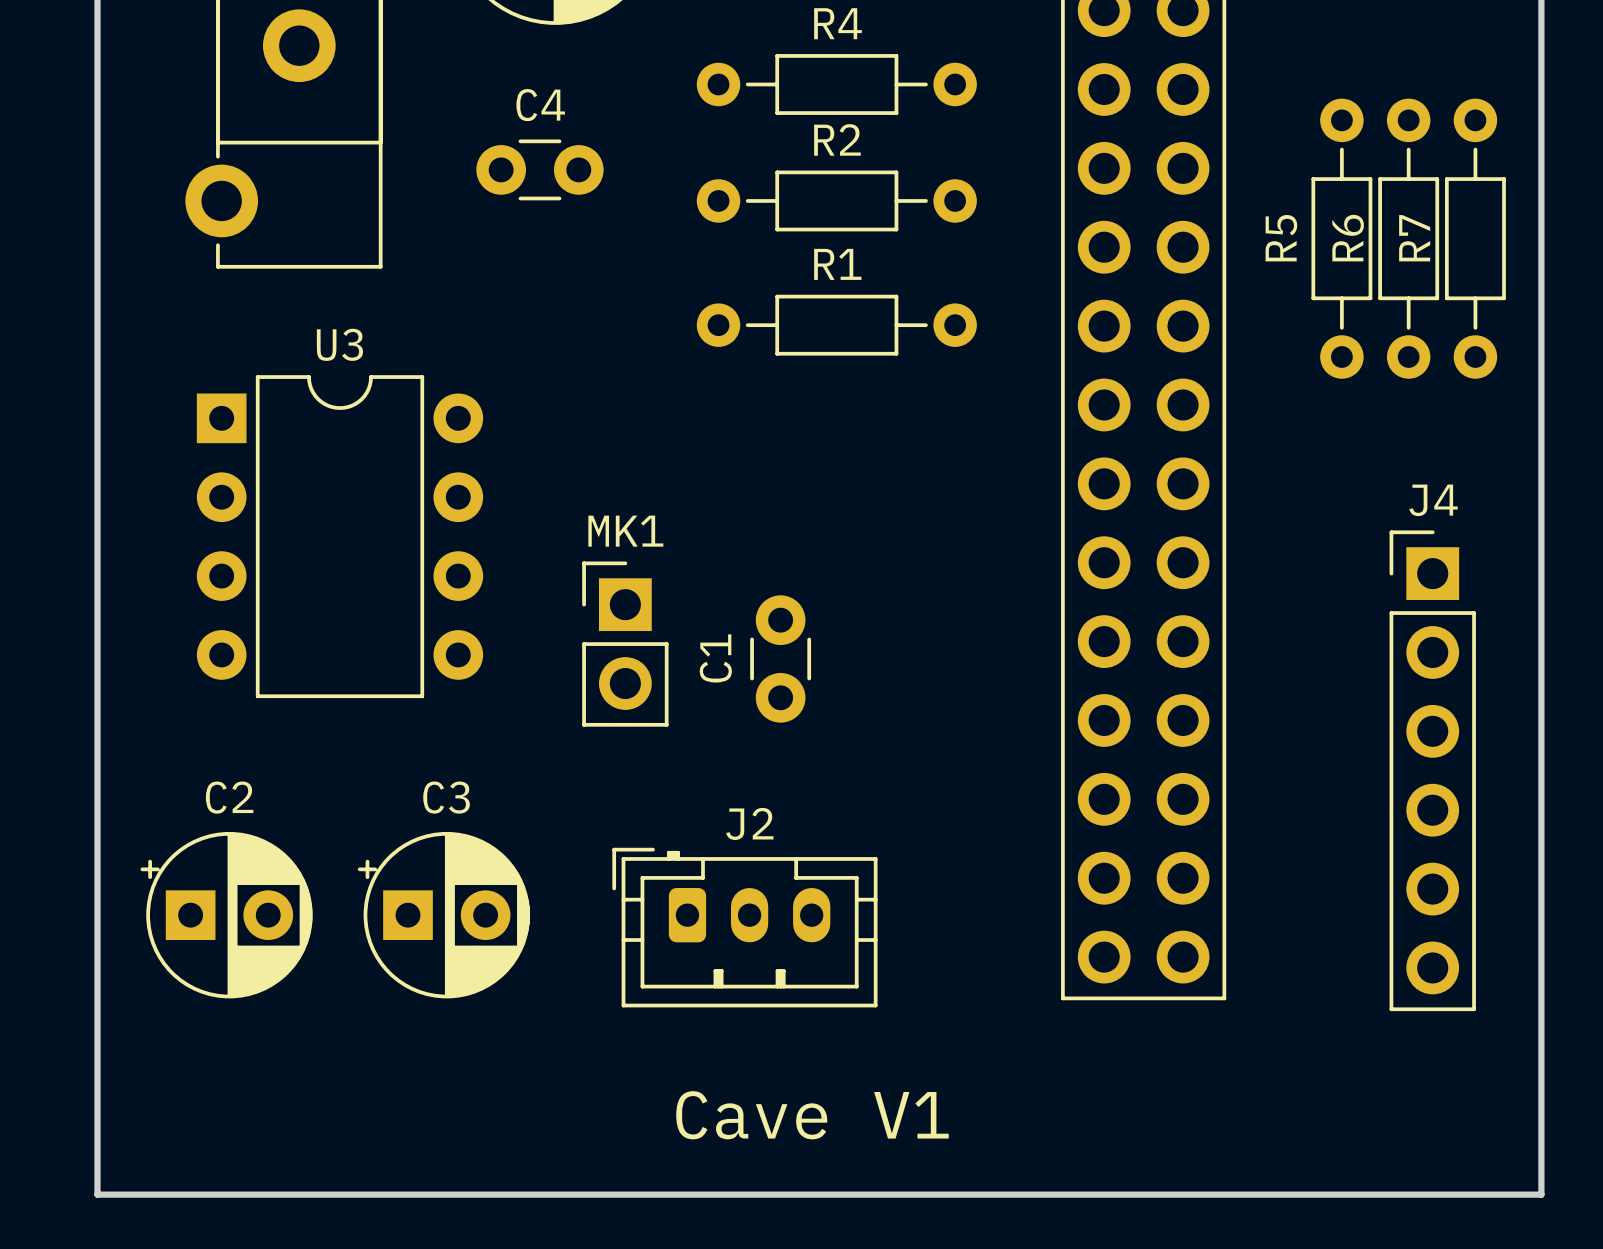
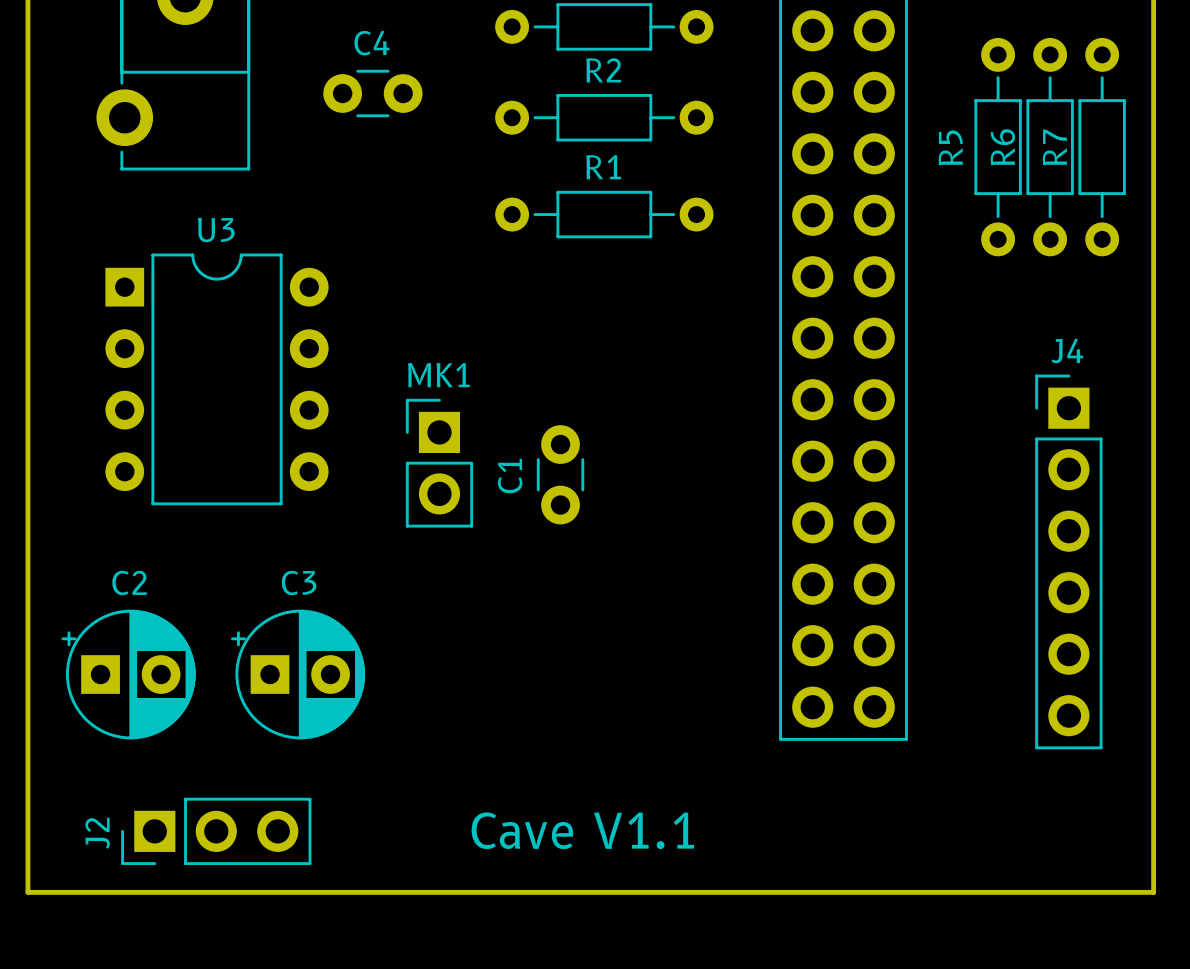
J2 name position: J2 (749, 823) -> J2 (97, 833)
J2 footprint: [612, 847, 878, 1008] -> [121, 797, 312, 866]
text: Cave V1 (812, 1115) -> Cave V1.1 (582, 830)

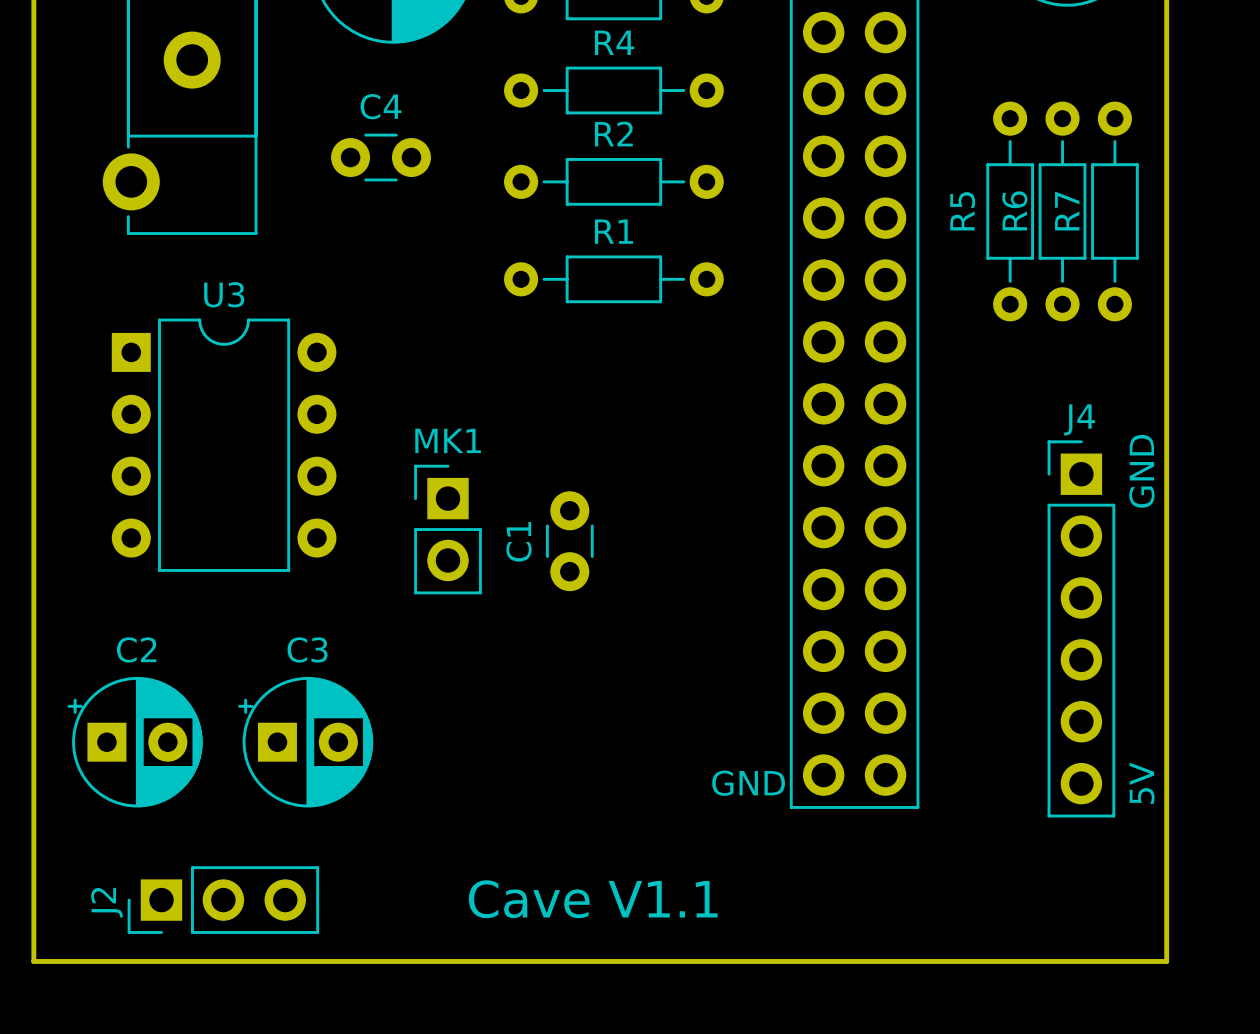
text: none -> GND (1141, 471)
text: none -> GND (748, 783)
text: none -> 5V (1142, 783)

